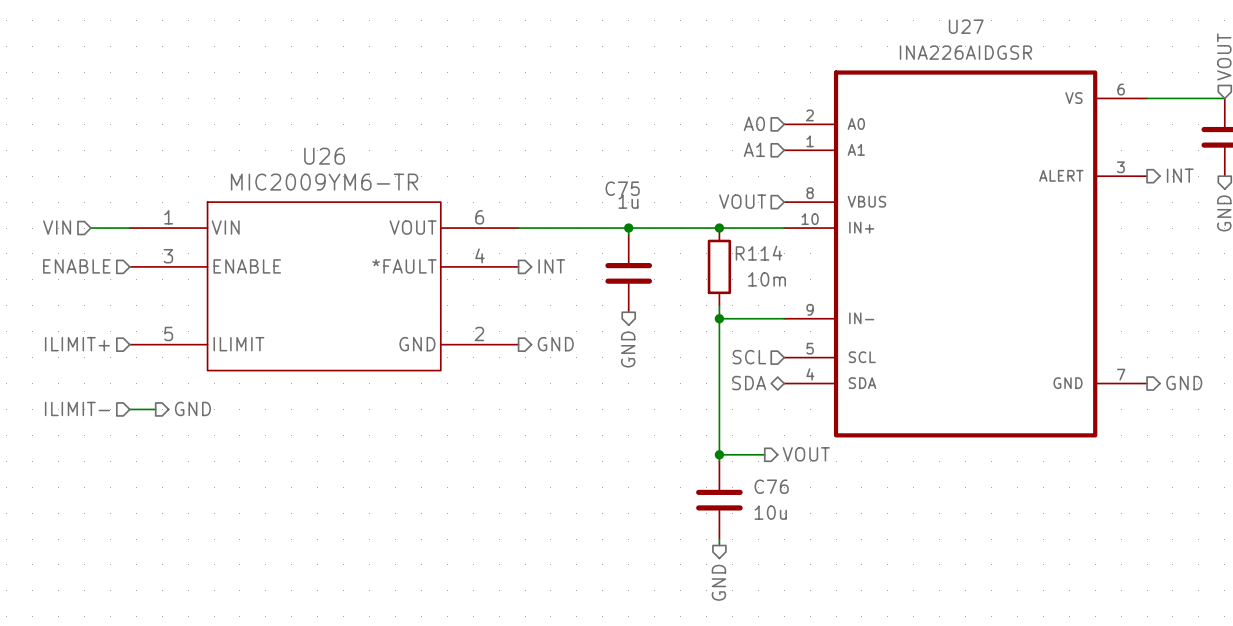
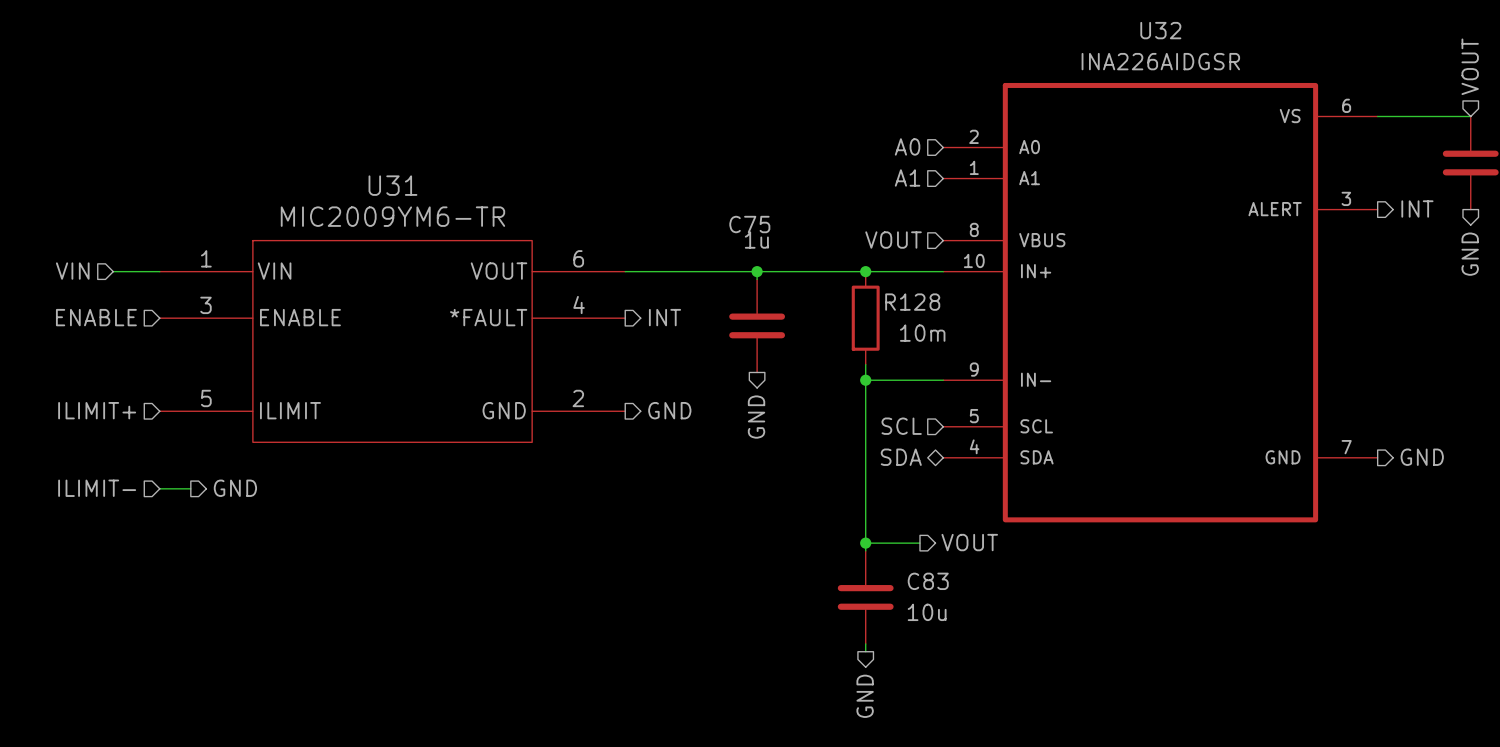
U27 name: U27 (966, 26) -> U32 (1160, 30)
U26 name: U26 (324, 156) -> U31 (392, 185)
R114 name: R114 (759, 253) -> R128 (912, 302)
C76 name: C76 (771, 486) -> C83 (928, 581)

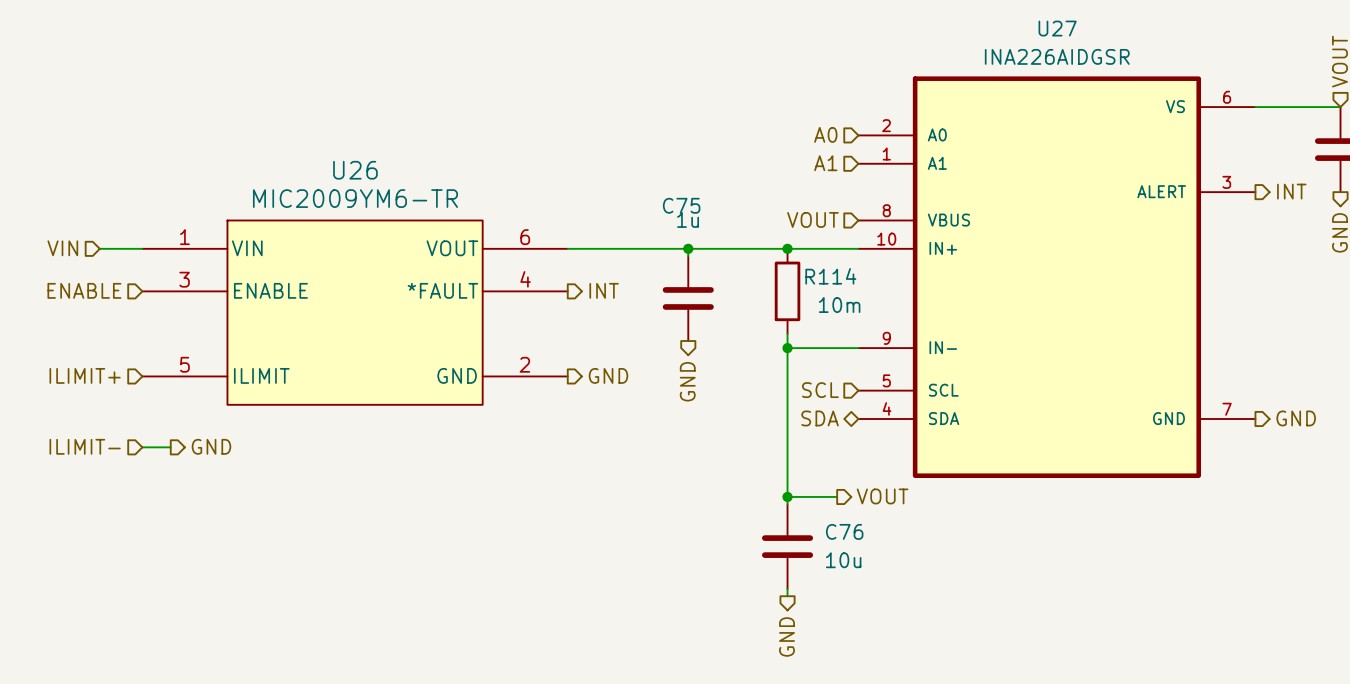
U32 name: U32 (1160, 30) -> U27 (1057, 28)
U31 name: U31 (392, 185) -> U26 (355, 170)
R128 name: R128 (912, 302) -> R114 (830, 276)
C83 name: C83 (928, 581) -> C76 (844, 531)

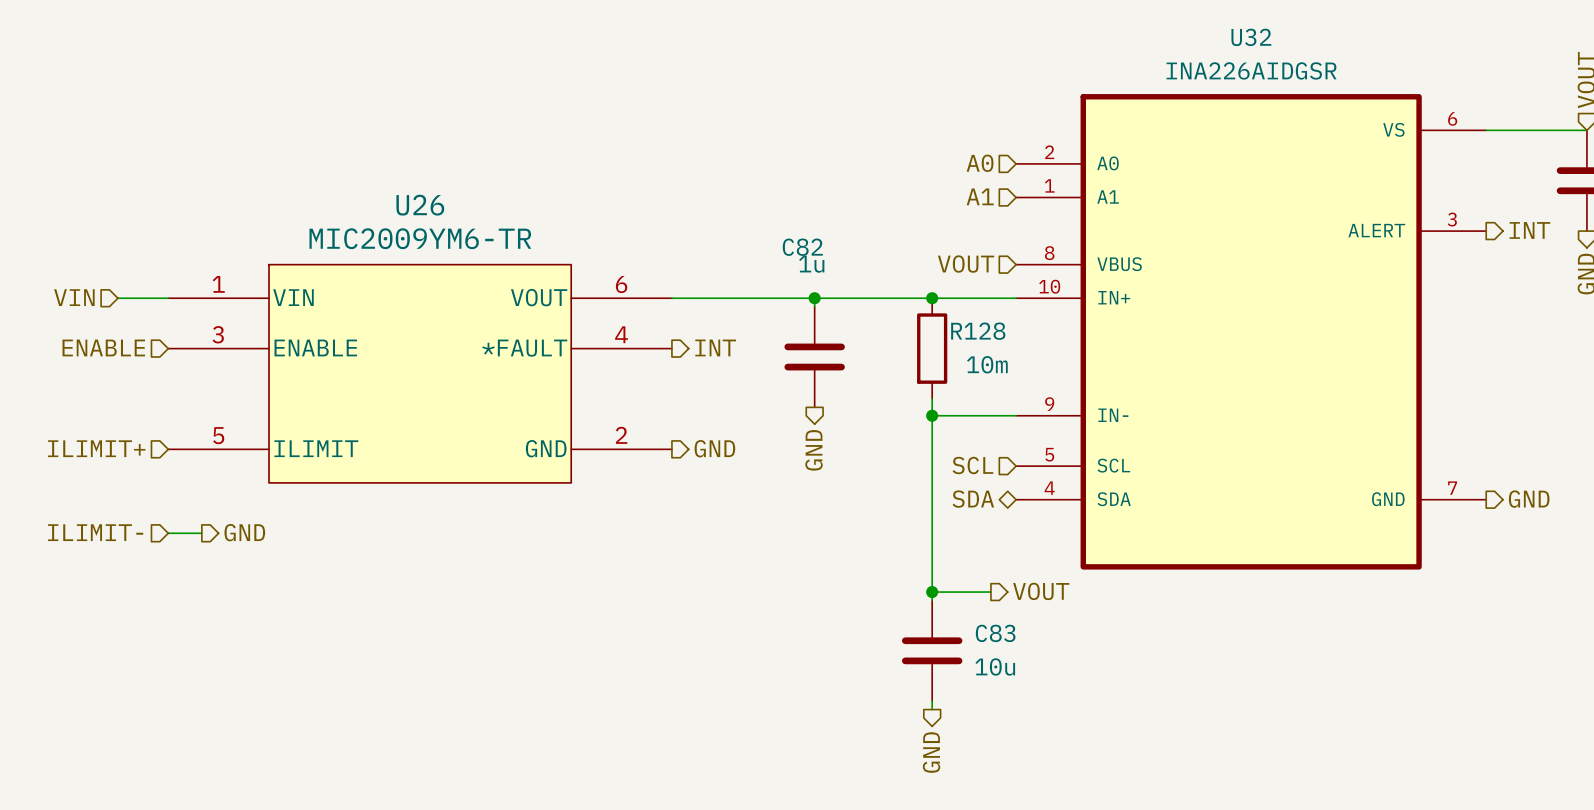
U27 name: U27 (1057, 28) -> U32 (1251, 37)
C75 name: C75 (681, 205) -> C82 (802, 247)
R114 name: R114 (830, 276) -> R128 (978, 331)
C76 name: C76 (844, 531) -> C83 (995, 633)

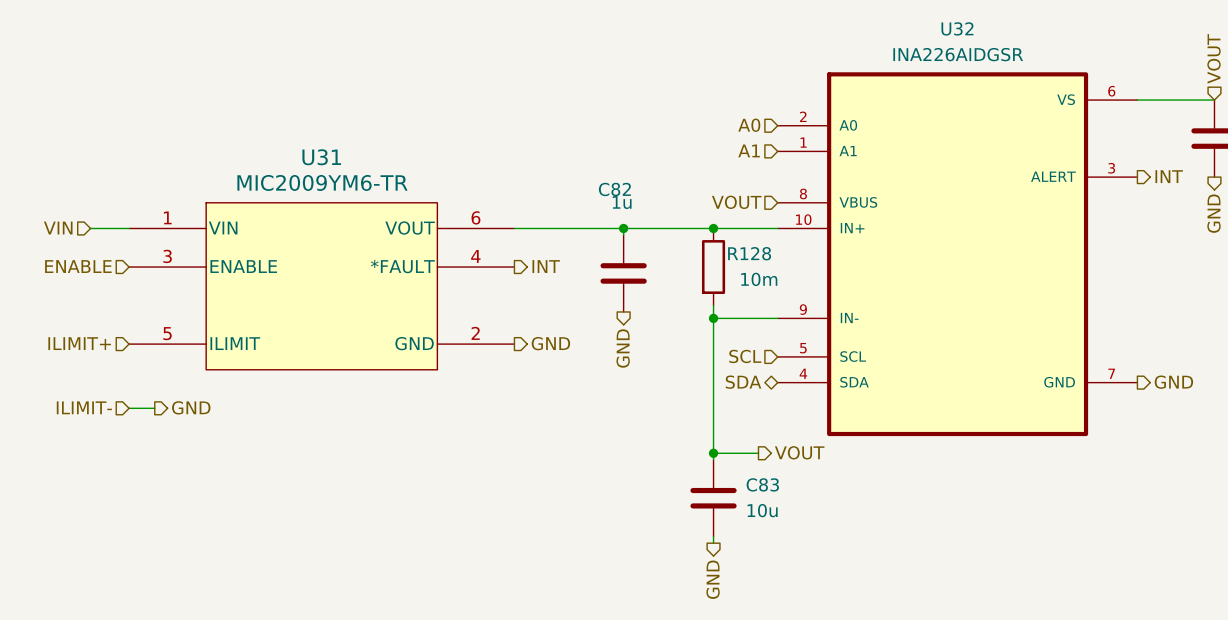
U26 name: U26 (420, 205) -> U31 (321, 157)

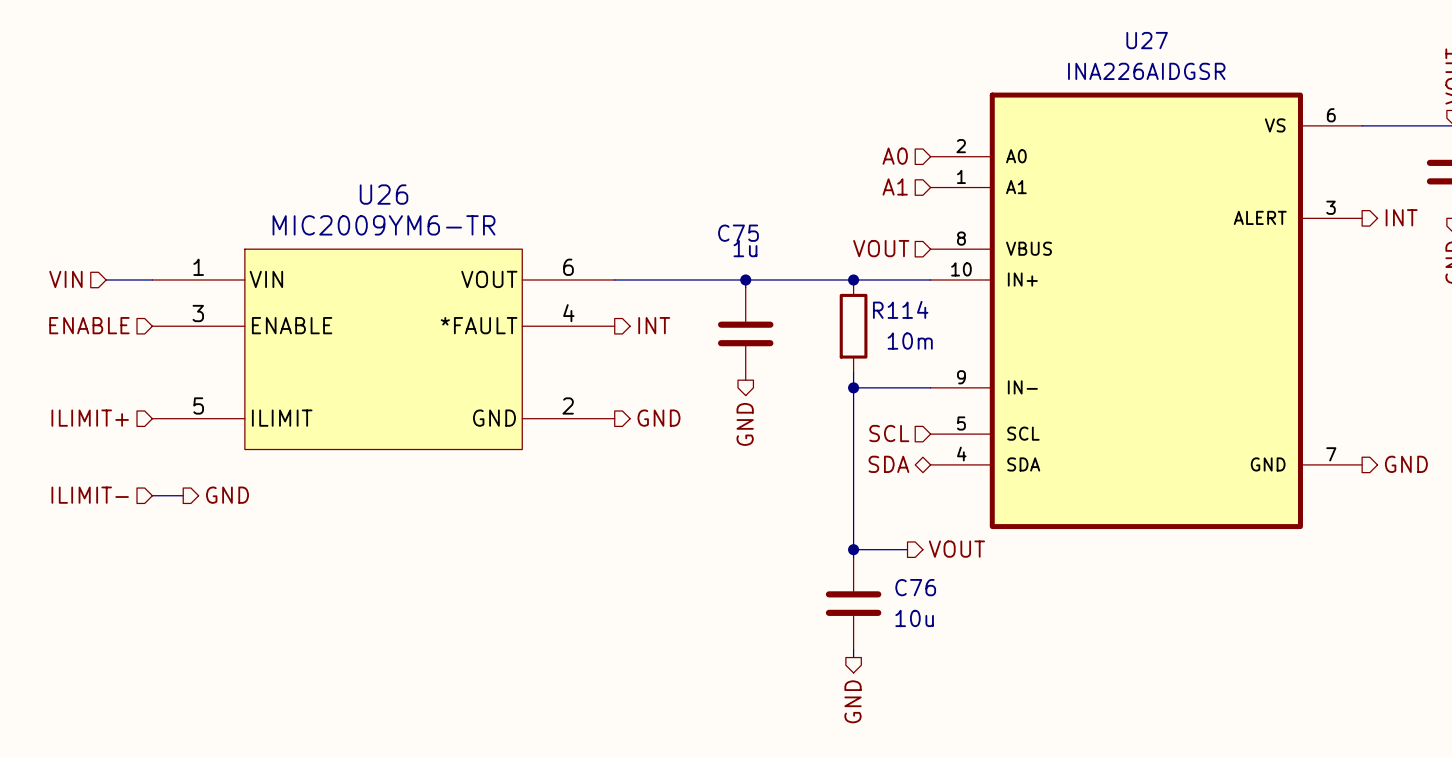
U32 name: U32 (957, 28) -> U27 (1147, 40)
U31 name: U31 (321, 157) -> U26 (384, 194)
C82 name: C82 (614, 189) -> C75 (738, 233)
R128 name: R128 (749, 253) -> R114 (900, 309)
C83 name: C83 (762, 484) -> C76 (915, 587)

